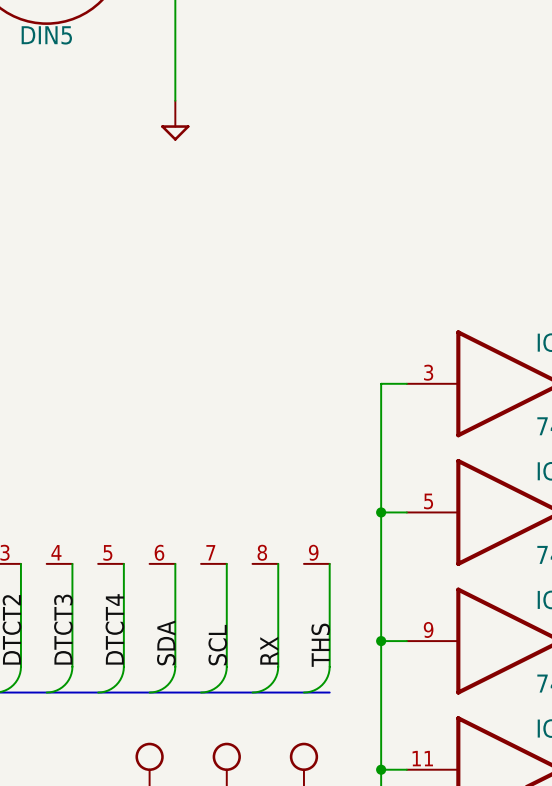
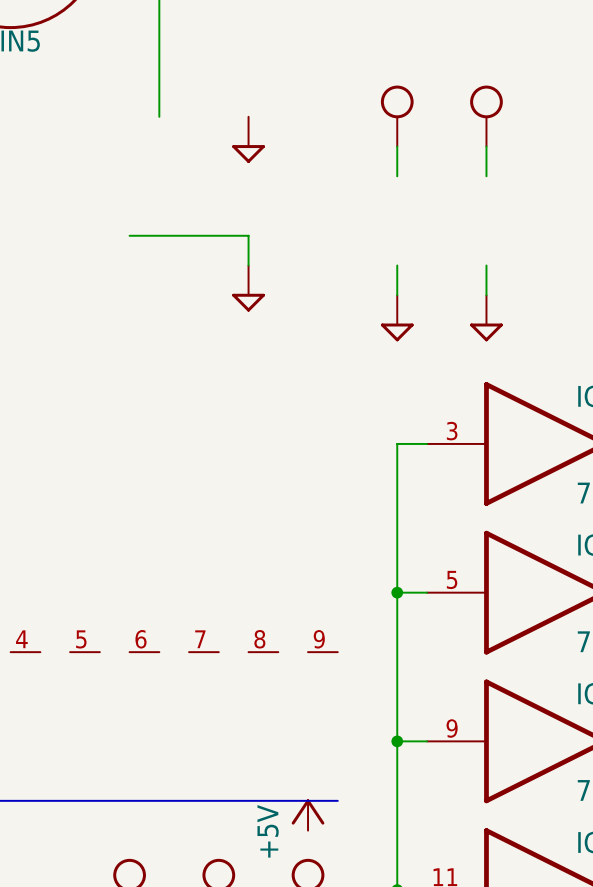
power symbol: none -> (397, 116)
power symbol: none -> (486, 116)
power symbol: (175, 120) -> none
power symbol: none -> (248, 139)
wire: none -> (397, 146) (397, 176)
wire: none -> (486, 146) (486, 176)
wire: none -> (129, 235) (248, 235) (248, 265)
wire: none -> (397, 265) (397, 295)
wire: none -> (486, 265) (486, 295)
power symbol: none -> (248, 288)
power symbol: none -> (397, 318)
power symbol: none -> (486, 318)
wire: (72, 563) (71, 673) (62, 687) (46, 692) -> none
wire: (123, 563) (123, 673) (113, 687) (98, 692) -> none
wire: (175, 563) (174, 673) (165, 687) (149, 692) -> none
wire: (226, 563) (225, 673) (216, 687) (201, 692) -> none
wire: (278, 563) (277, 673) (268, 687) (252, 692) -> none
wire: (329, 563) (328, 673) (319, 687) (303, 692) -> none
label: DTCT3 (63, 629) -> none
label: DTCT4 (114, 629) -> none
label: SDA (166, 642) -> none
label: SCL (217, 645) -> none
label: THS (320, 645) -> none
label: RX (269, 650) -> none
power symbol: none -> +5V (308, 814)

